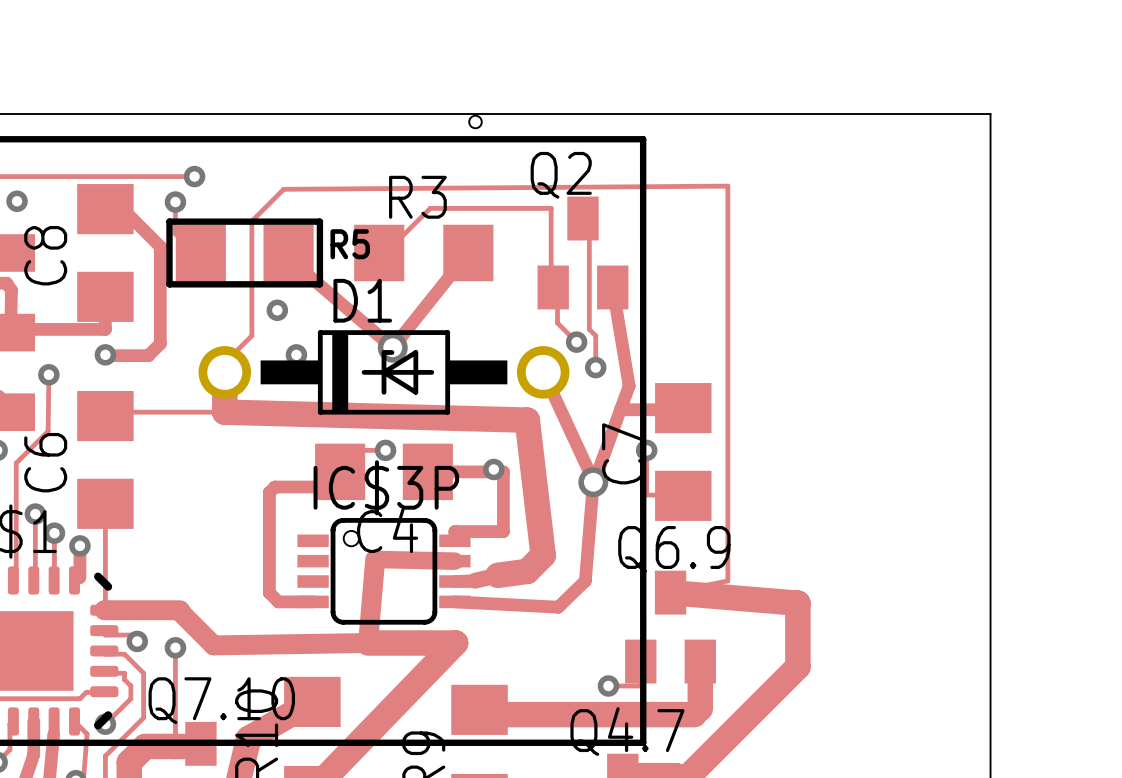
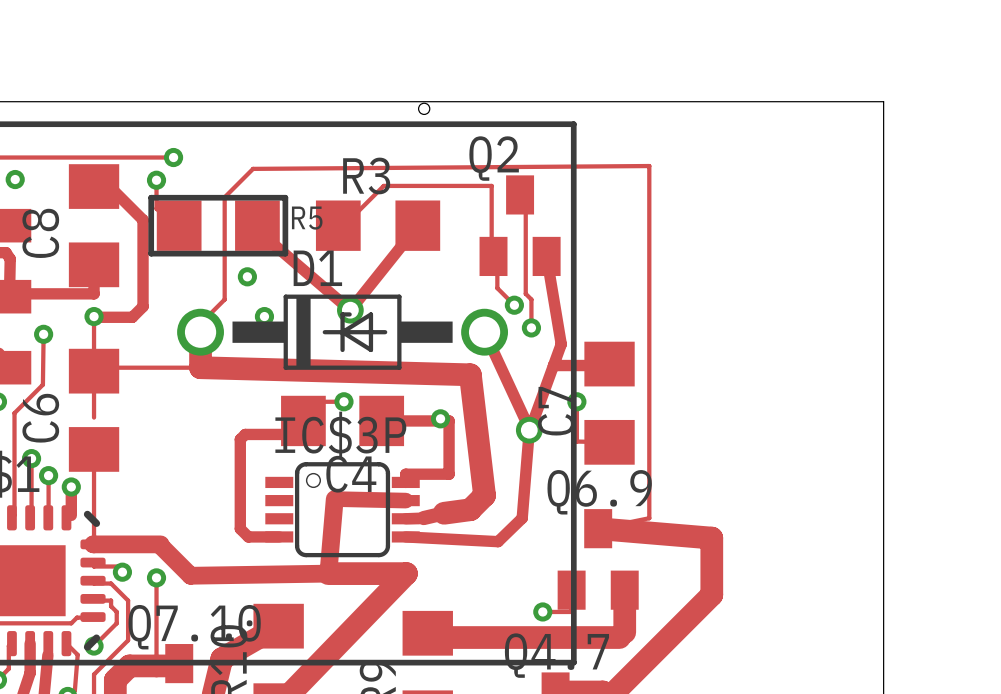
track: none -> (94, 316) (94, 367)
track: none -> (94, 371) (94, 417)

